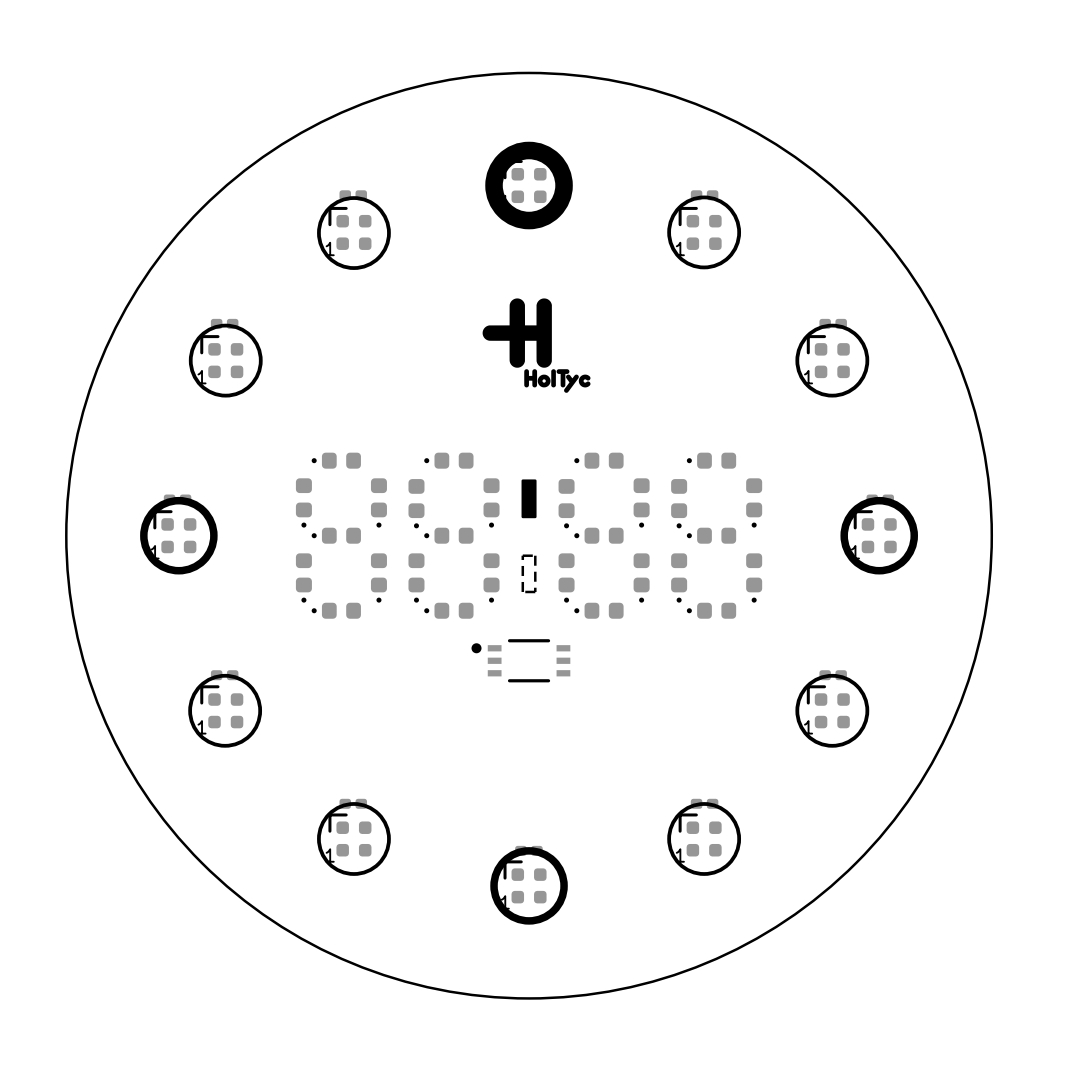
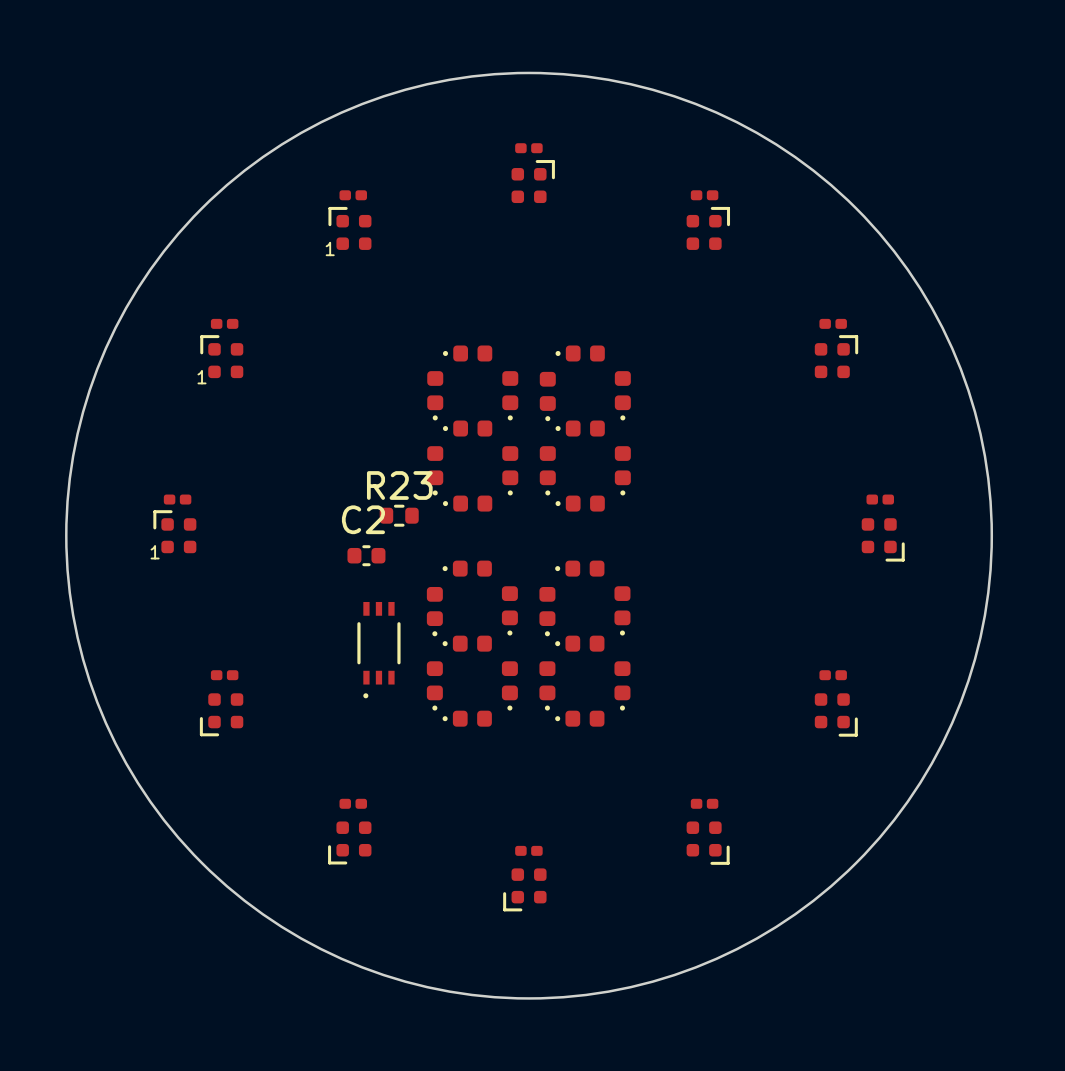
drawing: [485, 141, 573, 230] -> none
part footprint: [503, 160, 547, 204] -> [511, 160, 555, 204]
drawing: [667, 195, 742, 270] -> none
drawing: [317, 196, 391, 270] -> none
part footprint: [678, 206, 722, 250] -> [686, 206, 731, 250]
drawing: [482, 298, 591, 393] -> none
drawing: [188, 323, 263, 398] -> none
drawing: [795, 323, 870, 398] -> none
part footprint: [806, 335, 850, 379] -> [814, 335, 859, 379]
part: none -> (467, 353)
part: none -> (580, 353)
part: none -> (435, 395)
part: none -> (510, 395)
part: none -> (622, 395)
part: none -> (547, 396)
part: none -> (467, 428)
part: none -> (580, 428)
part: (336, 460) -> none
part rotation: 0° (448, 460) -> 90° counterclockwise (435, 470)
part: (598, 460) -> none
part: (711, 460) -> none
part: none -> (510, 470)
part: none -> (547, 470)
part: none -> (622, 470)
drawing: [521, 479, 537, 519] -> none
drawing: [140, 496, 218, 575] -> none
drawing: [840, 496, 918, 575] -> none
part: (303, 502) -> none
part: (378, 502) -> none
part: (491, 502) -> none
part: (641, 502) -> none
part: (754, 502) -> none
part: (416, 503) -> none
part: none -> (467, 503)
part rotation: 0° (566, 503) -> 90° clockwise (580, 503)
part: (679, 503) -> none
part footprint: [853, 510, 897, 554] -> [861, 518, 905, 562]
R23: none -> (399, 515)
part: (336, 535) -> none
part: (448, 535) -> none
part: (598, 535) -> none
part: (711, 535) -> none
C2: none -> (366, 555)
line: (522, 555) (535, 555) (535, 591) (522, 591) (522, 555) -> none
part: none -> (467, 568)
part: (303, 577) -> none
part: (378, 577) -> none
part: (416, 577) -> none
part: (491, 577) -> none
part rotation: 0° (566, 577) -> 90° clockwise (579, 568)
part: (641, 577) -> none
part: (679, 577) -> none
part: (754, 577) -> none
part: (336, 610) -> none
part rotation: 0° (448, 610) -> 90° counterclockwise (434, 611)
part: none -> (509, 610)
part: (598, 610) -> none
part: none -> (622, 610)
part: (711, 610) -> none
part: none -> (547, 611)
part: none -> (467, 643)
part: none -> (579, 643)
part: none -> (378, 650)
part: (520, 660) -> none
drawing: [188, 673, 263, 748] -> none
drawing: [795, 673, 870, 748] -> none
part footprint: [200, 685, 244, 729] -> [199, 693, 244, 737]
part: none -> (434, 685)
part: none -> (509, 685)
part: none -> (547, 685)
part: none -> (622, 685)
part footprint: [806, 685, 850, 729] -> [814, 693, 858, 737]
part: none -> (467, 718)
part: none -> (579, 718)
drawing: [317, 802, 391, 876] -> none
drawing: [667, 802, 742, 876] -> none
part footprint: [328, 813, 372, 857] -> [328, 821, 372, 865]
part footprint: [678, 813, 722, 857] -> [686, 821, 730, 865]
drawing: [490, 847, 568, 925] -> none
part footprint: [503, 860, 547, 904] -> [503, 868, 547, 912]

